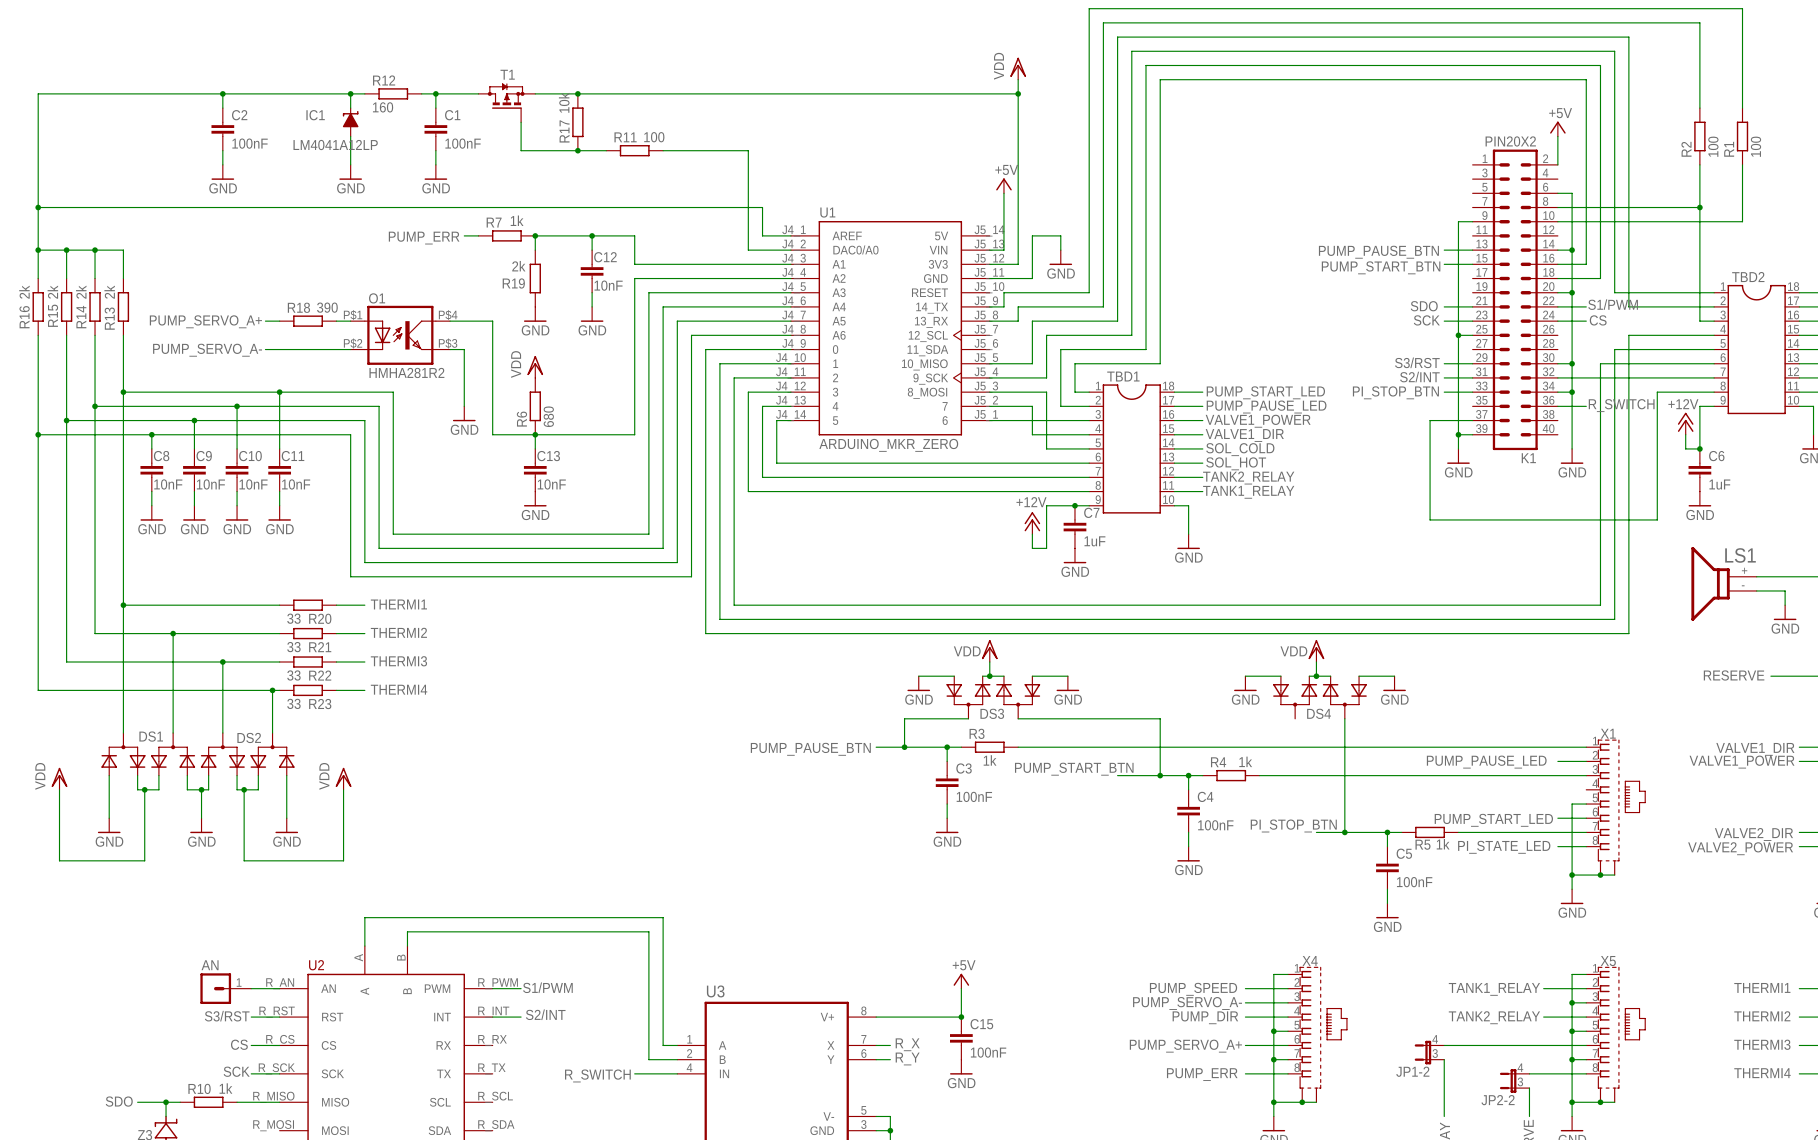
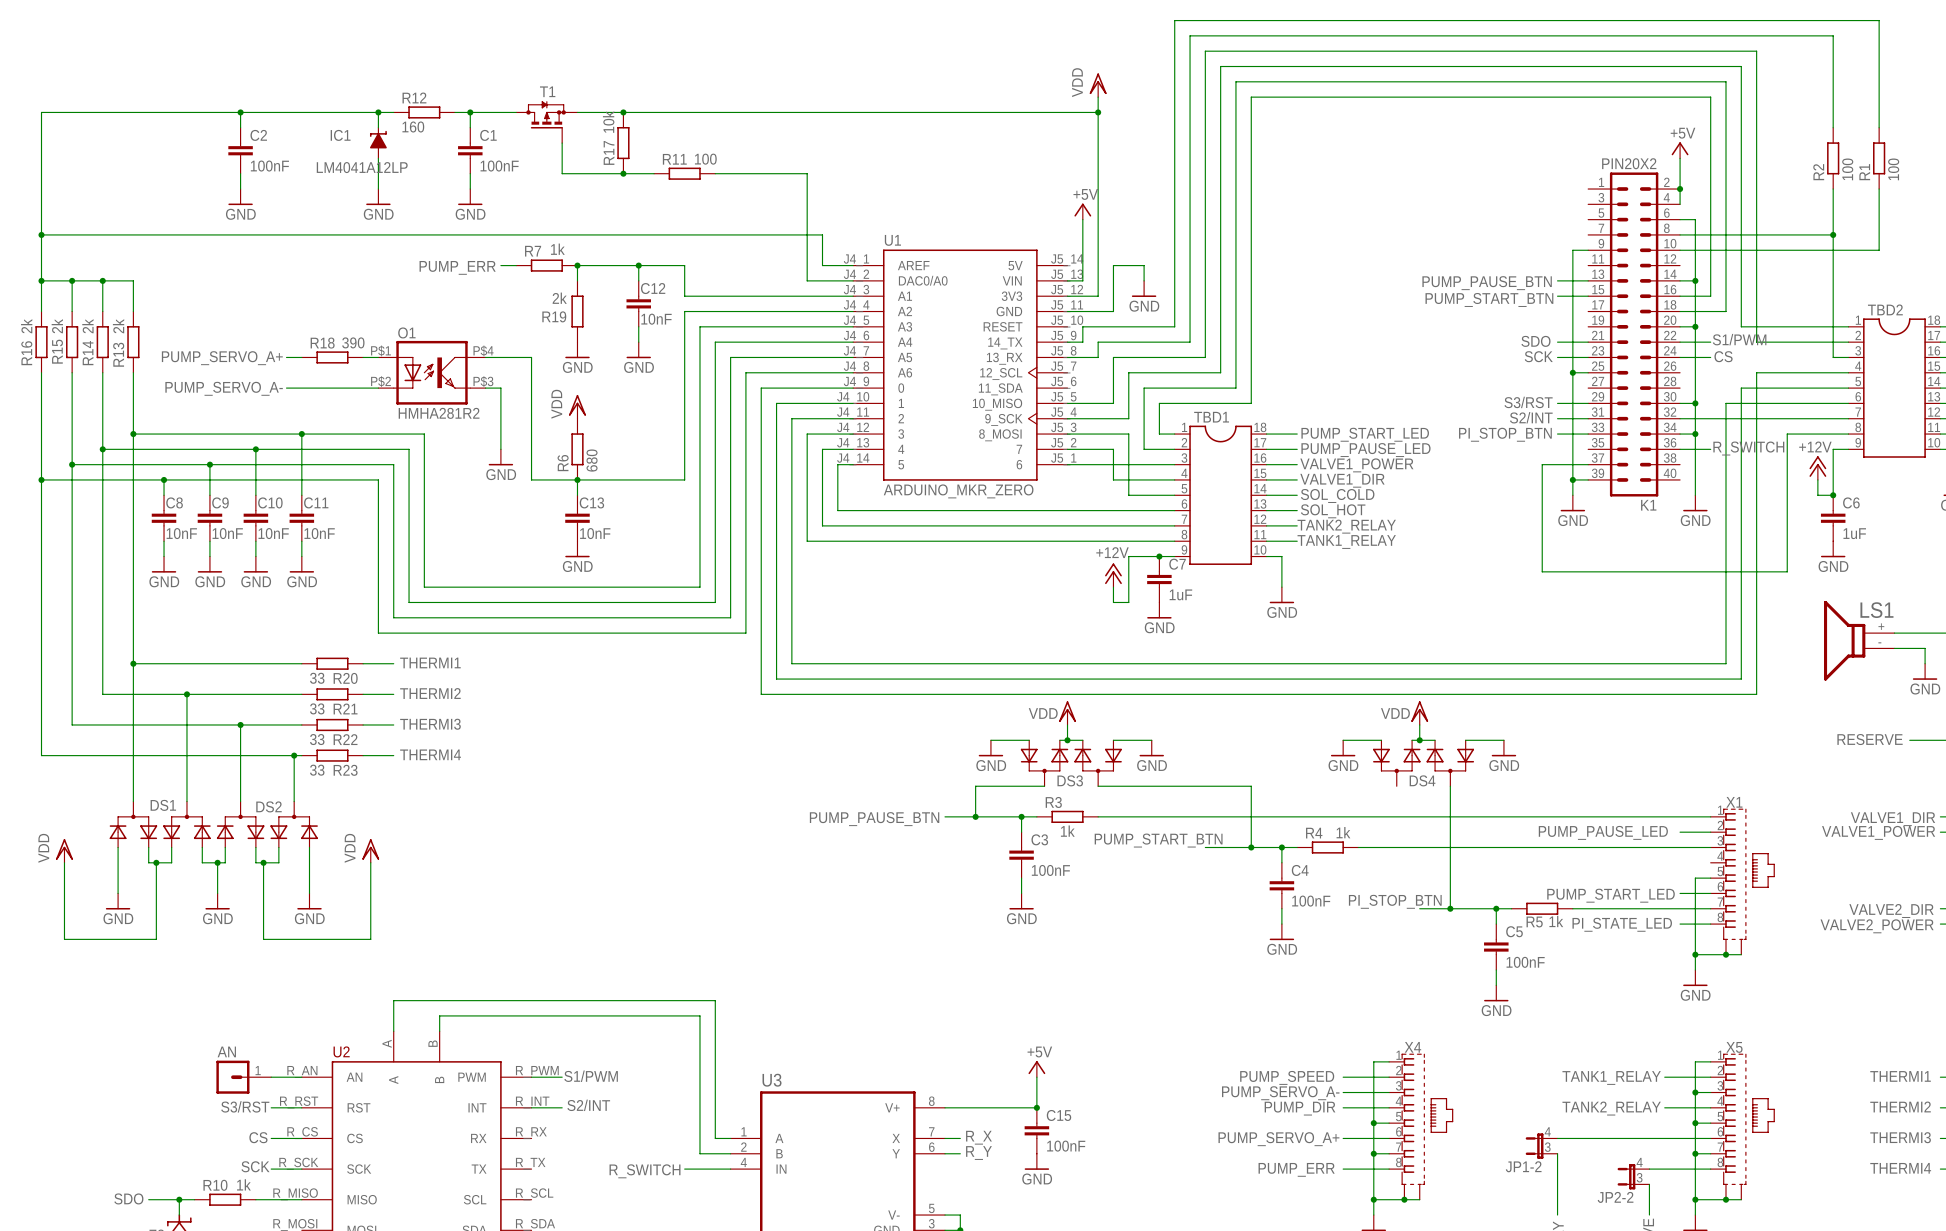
wire: none -> (1680, 189) (1680, 204)
junction: none -> (1680, 189)

